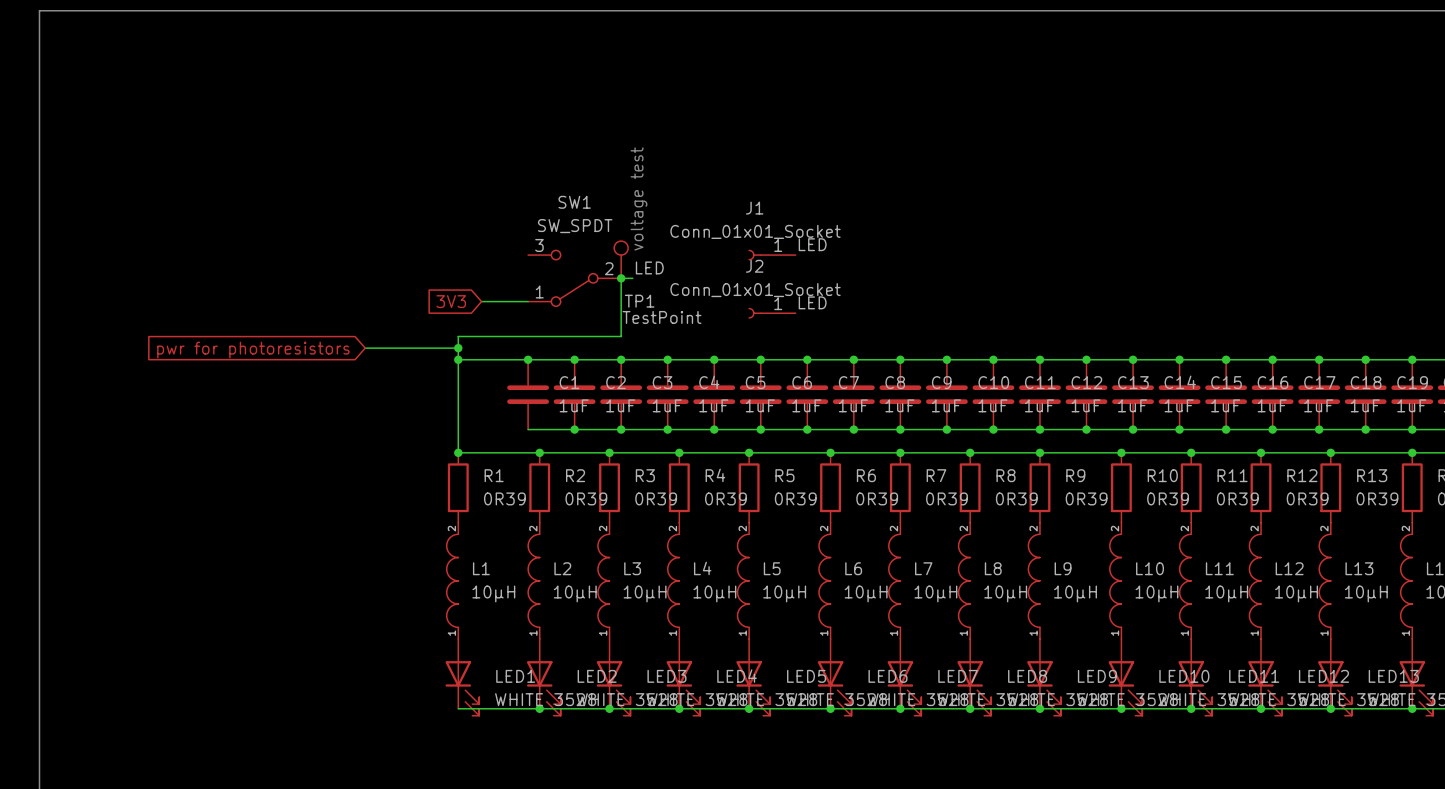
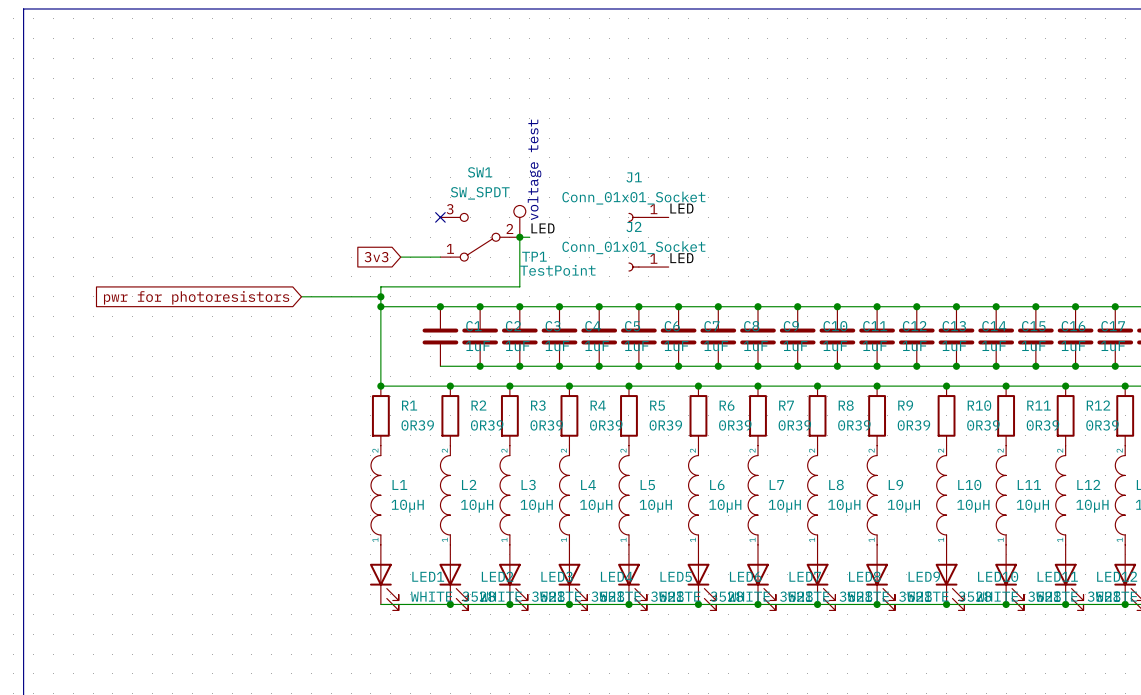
no-connect mark: none -> (440, 217)
global label: 3V3 (451, 301) -> 3v3 (376, 257)

